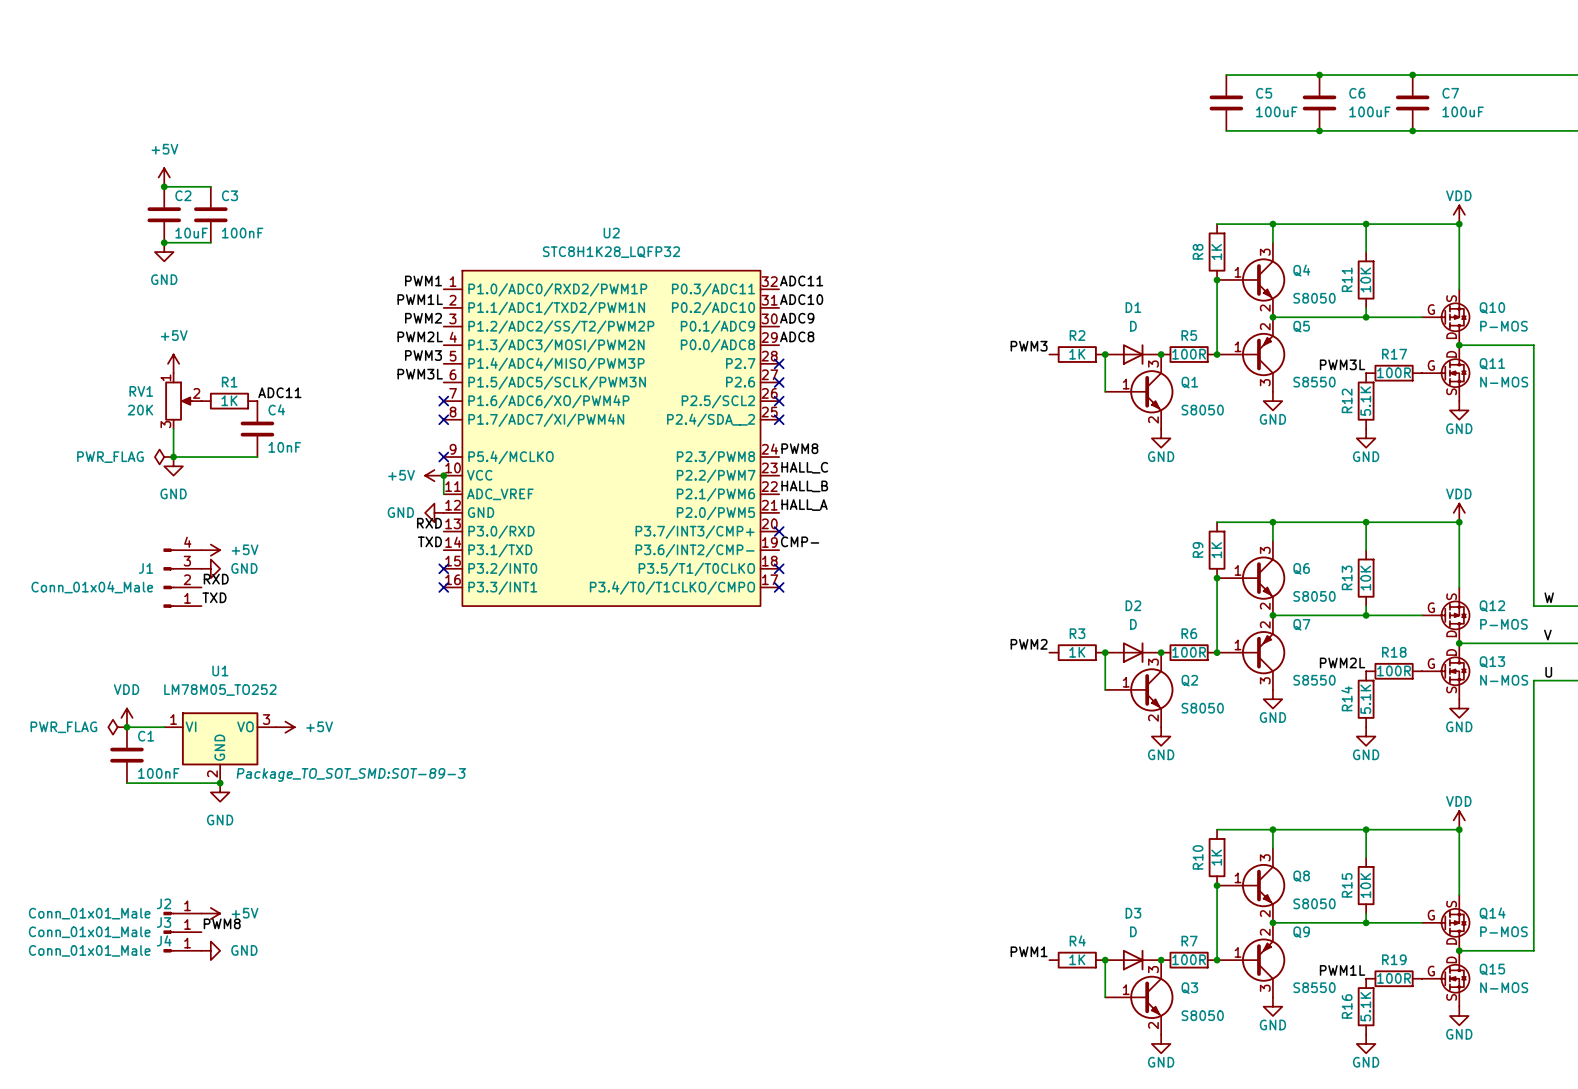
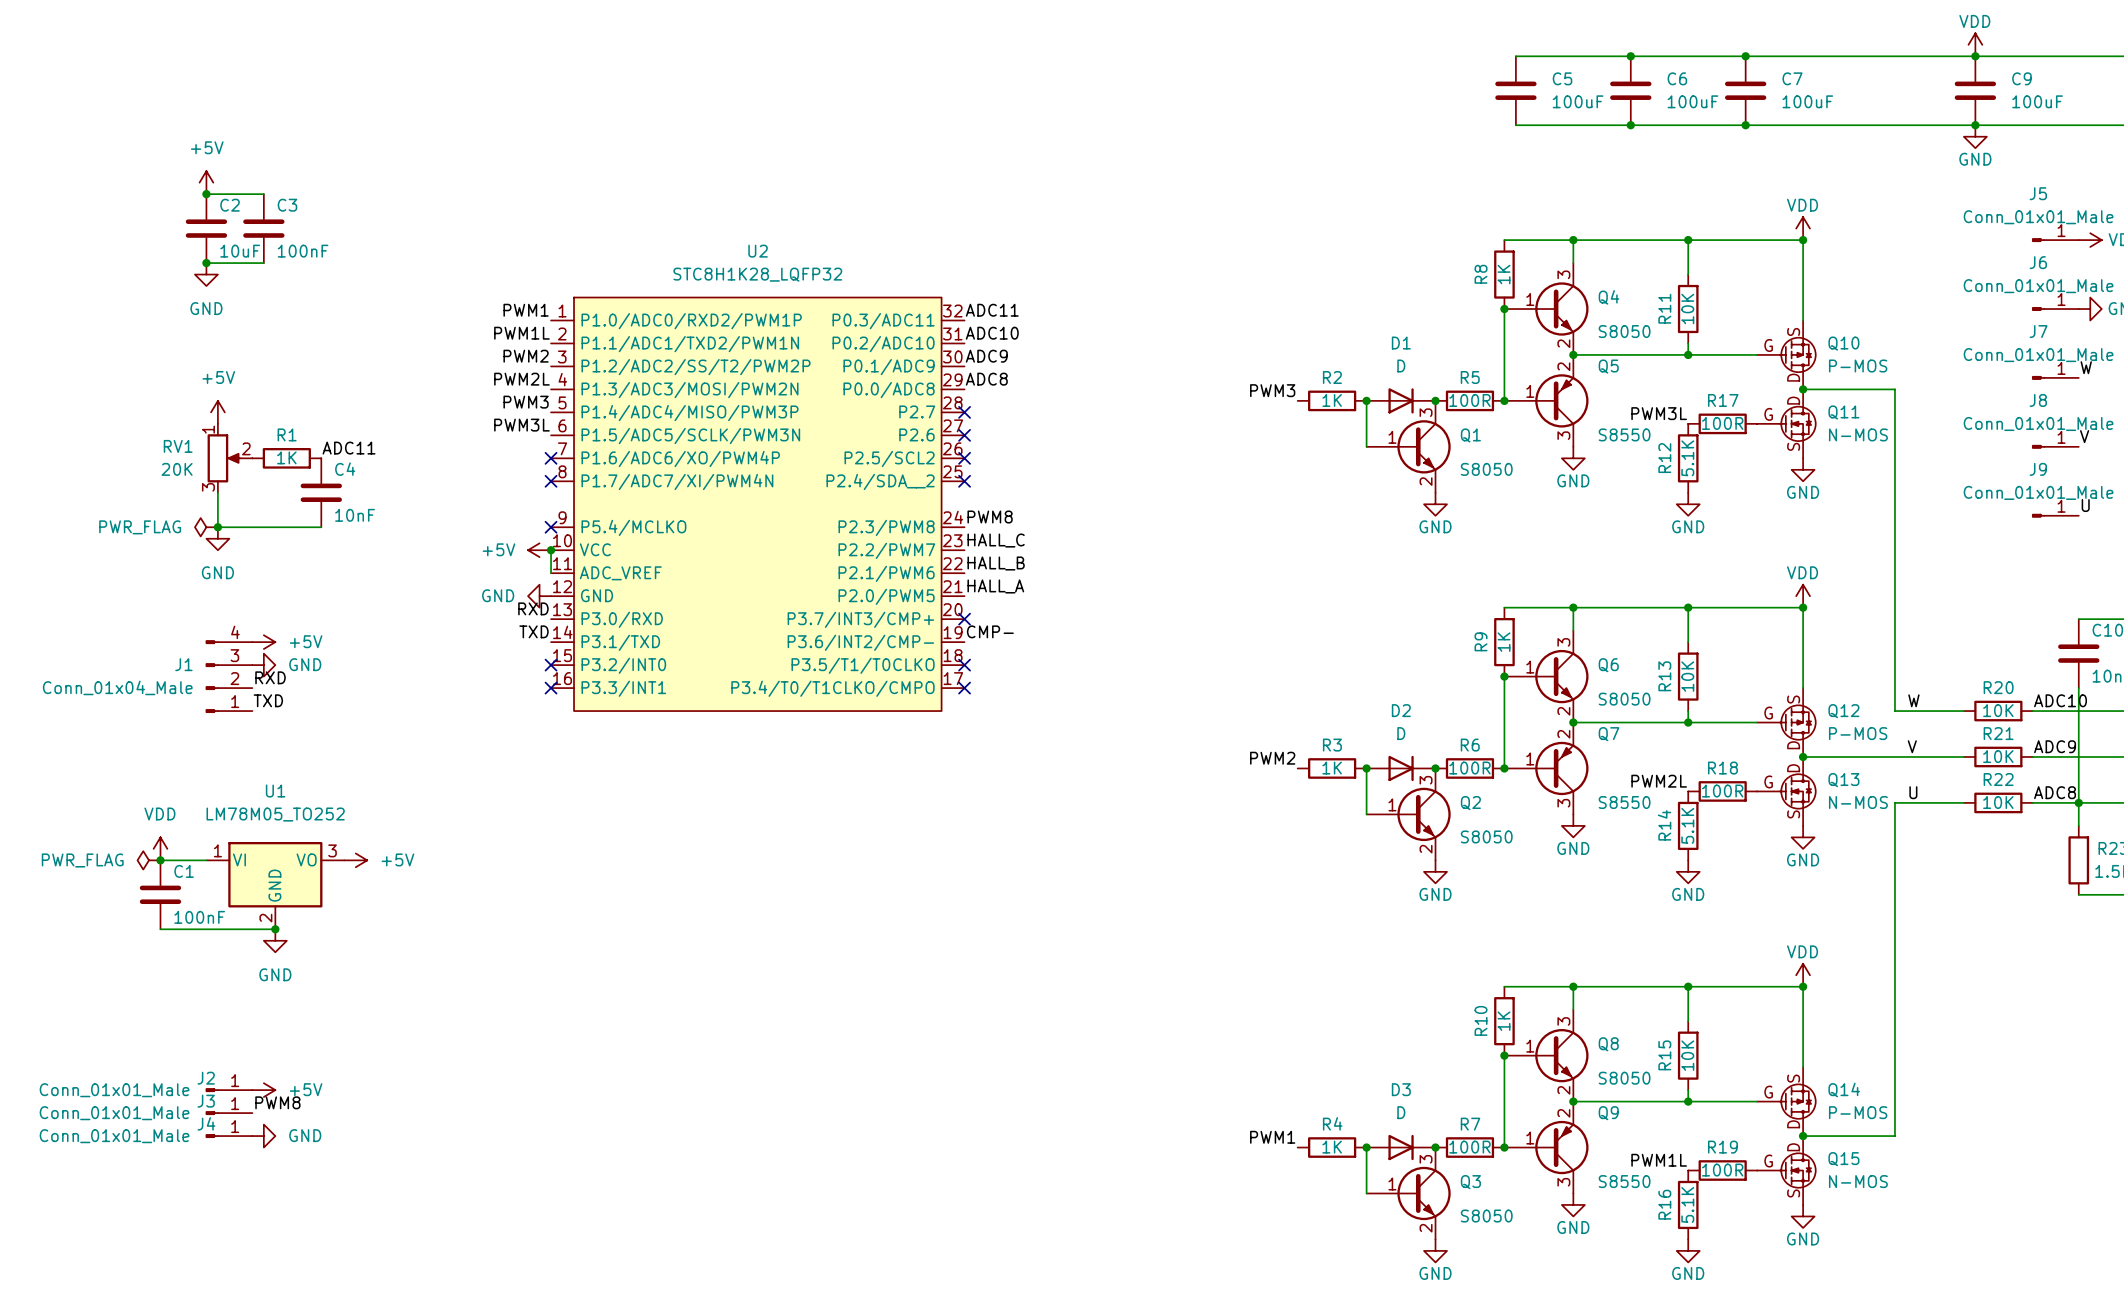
U1 text: Package_TO_SOT_SMD:SOT-89-3 (351, 774) -> none

